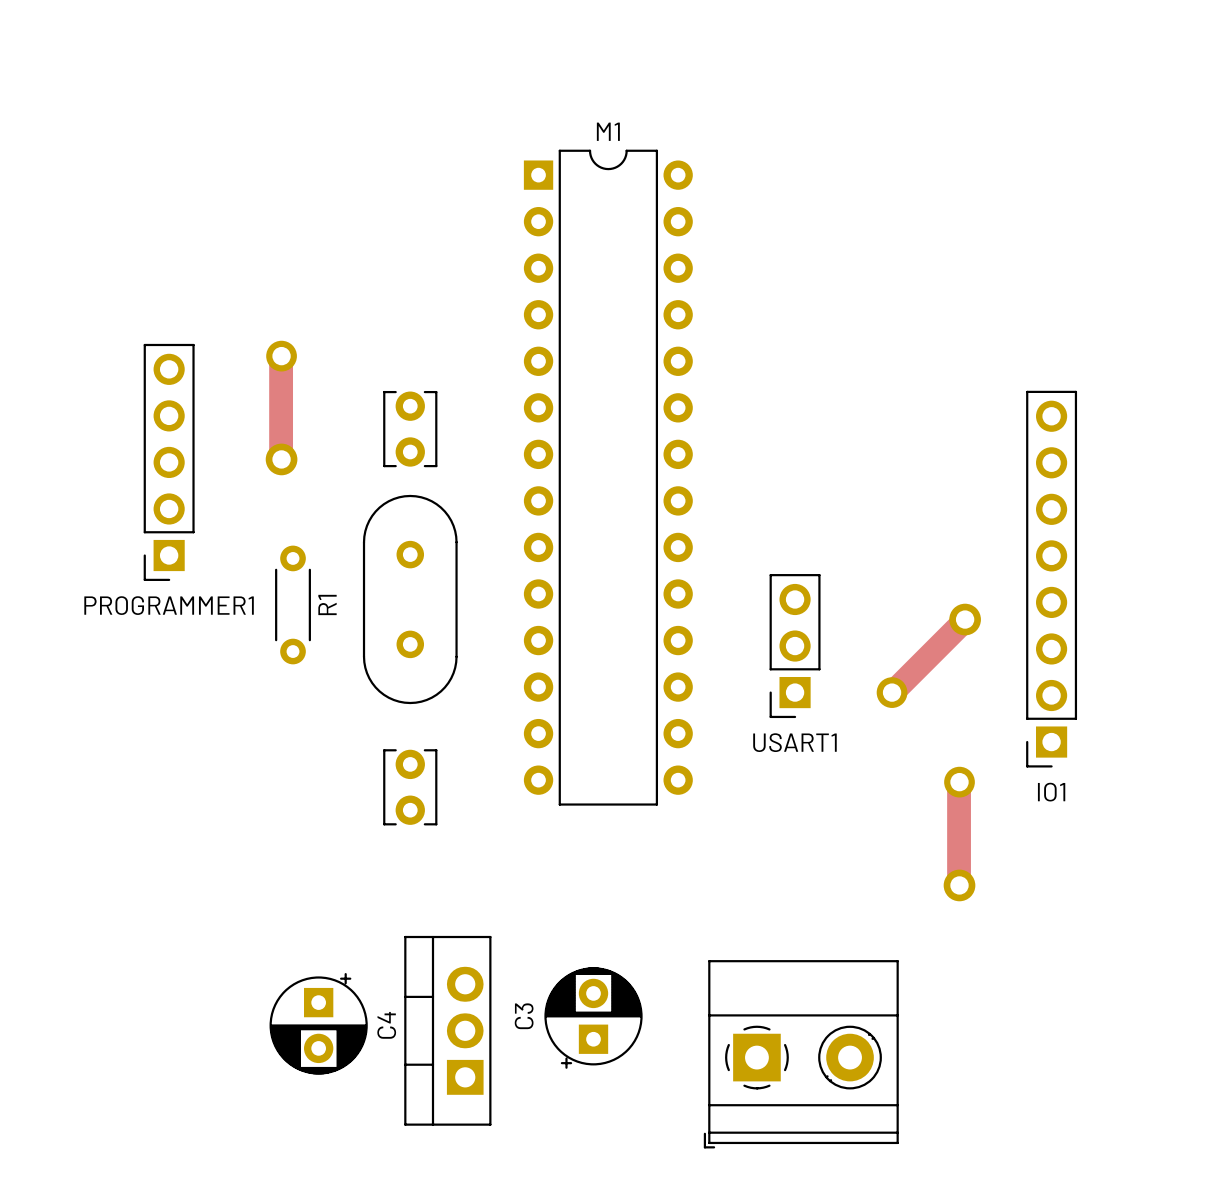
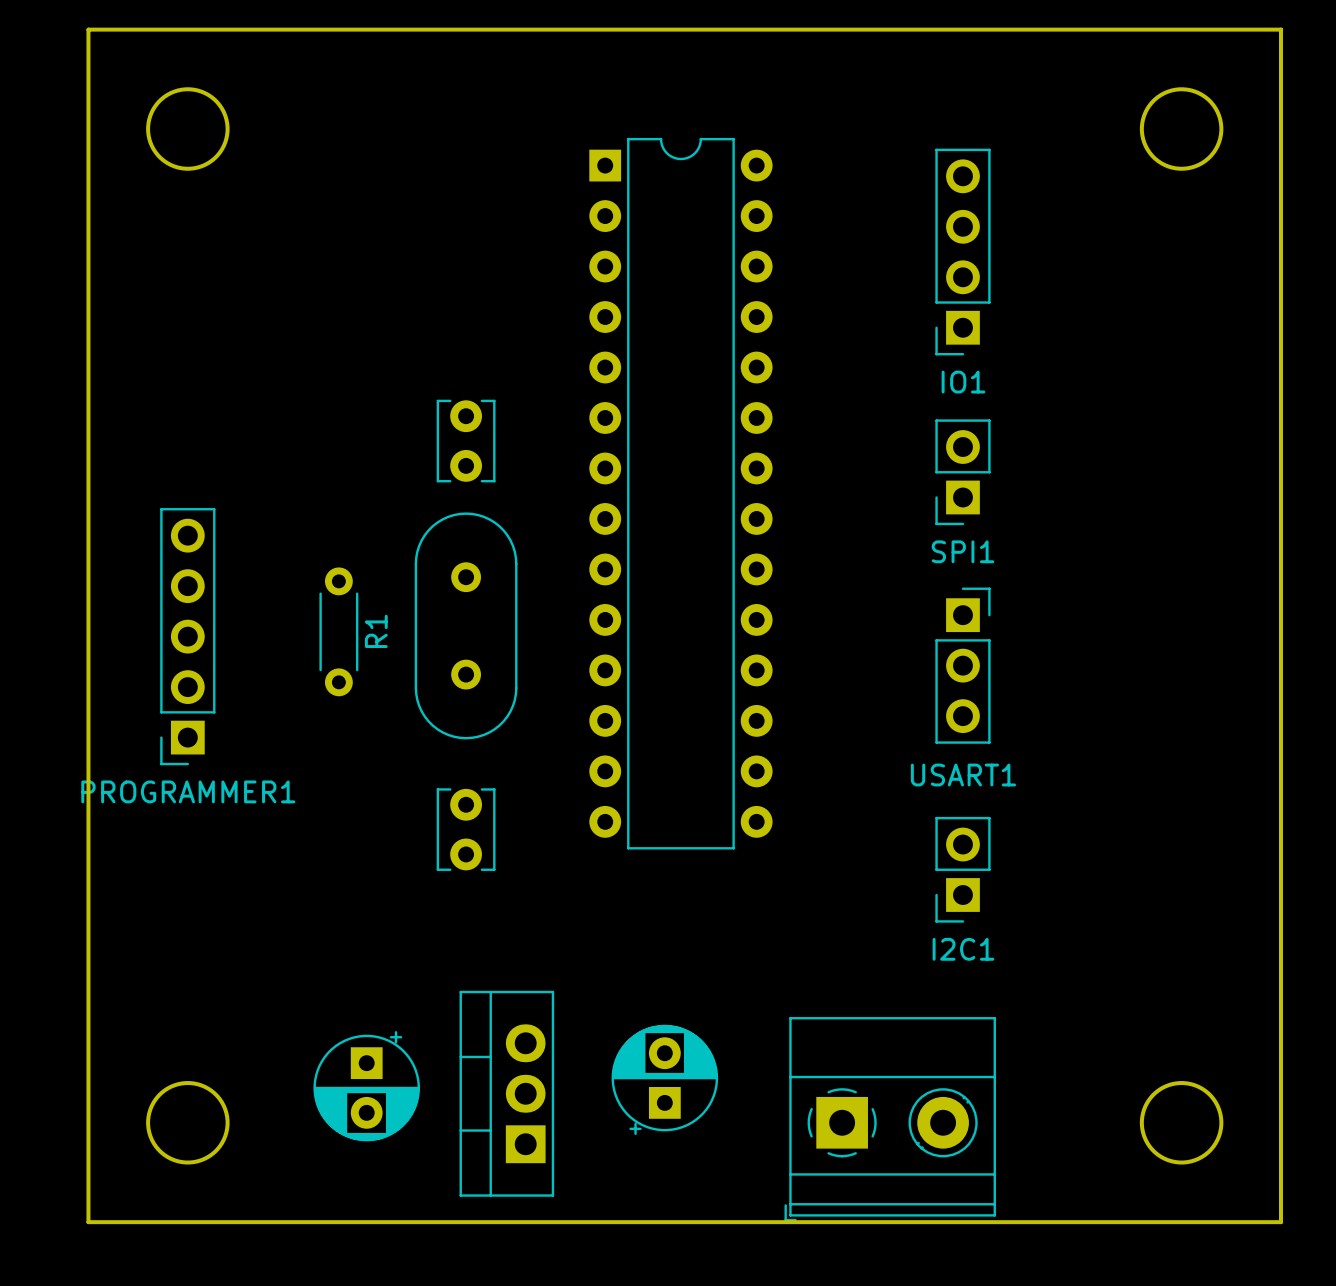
board edge: none -> (88, 29) (1280, 29) (1280, 1222) (88, 1222) (88, 29)
round board edge: none -> [146, 87, 230, 171]
round board edge: none -> [1139, 87, 1224, 171]
M1 name: M1 (608, 131) -> none
IO1 footprint: [1026, 390, 1078, 768] -> [935, 148, 991, 356]
part: (281, 408) -> none
SPI1: none -> (962, 472)
PROGRAMMER1 position: (169, 462) -> (187, 636)
USART1 rotation: 0° (795, 646) -> 180° (962, 665)
part: (928, 655) -> none
IO1 name position: IO1 (1051, 792) -> IO1 (963, 382)
I2C1: none -> (962, 869)
part: (959, 834) -> none
C3 name: C3 (524, 1016) -> none
round board edge: none -> [146, 1081, 230, 1165]
round board edge: none -> [1139, 1081, 1224, 1165]
C4 name: C4 (386, 1025) -> none

